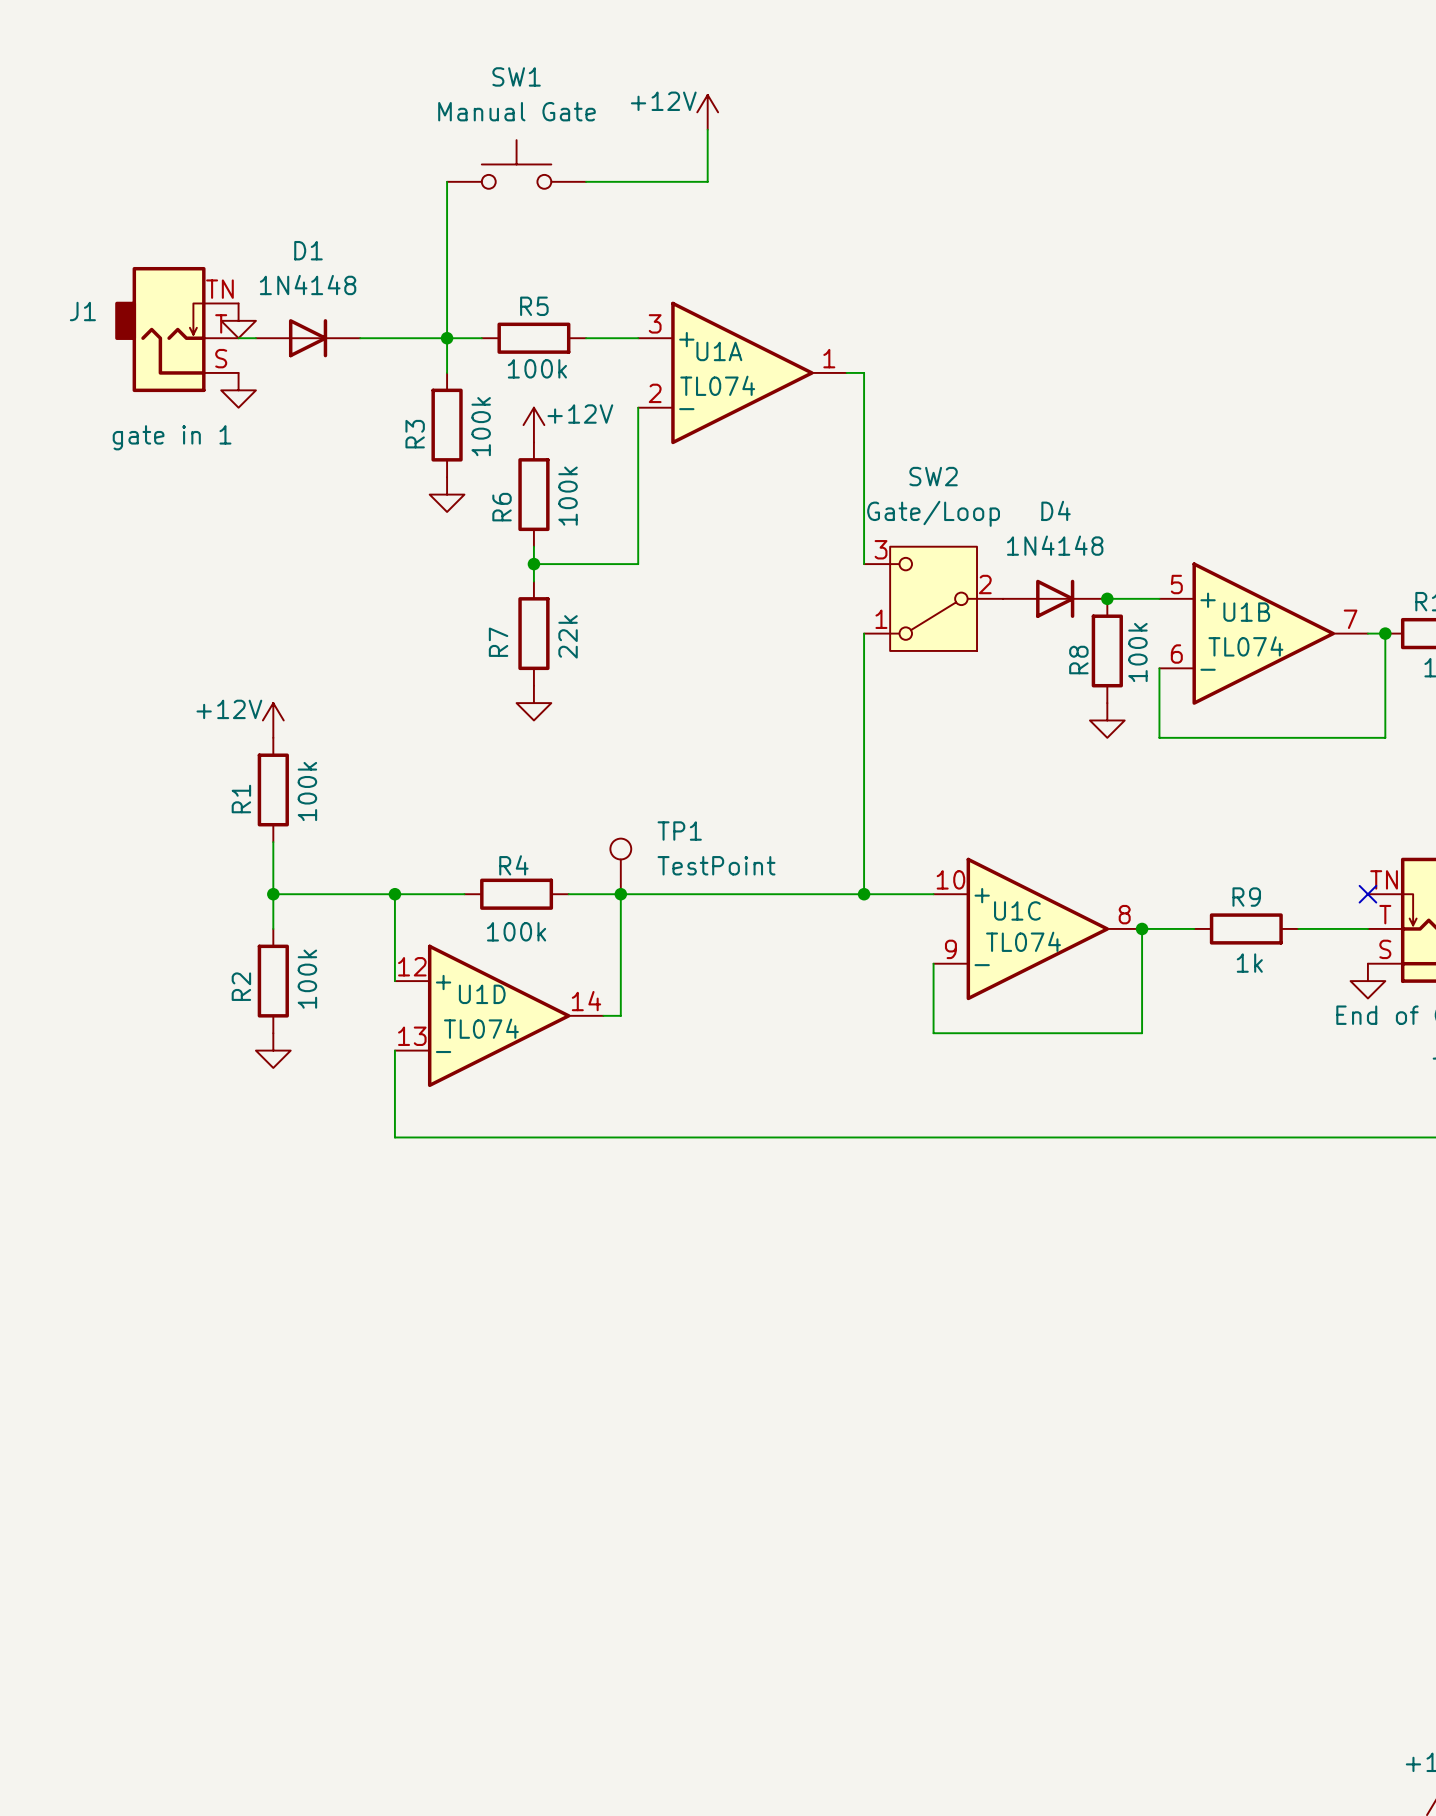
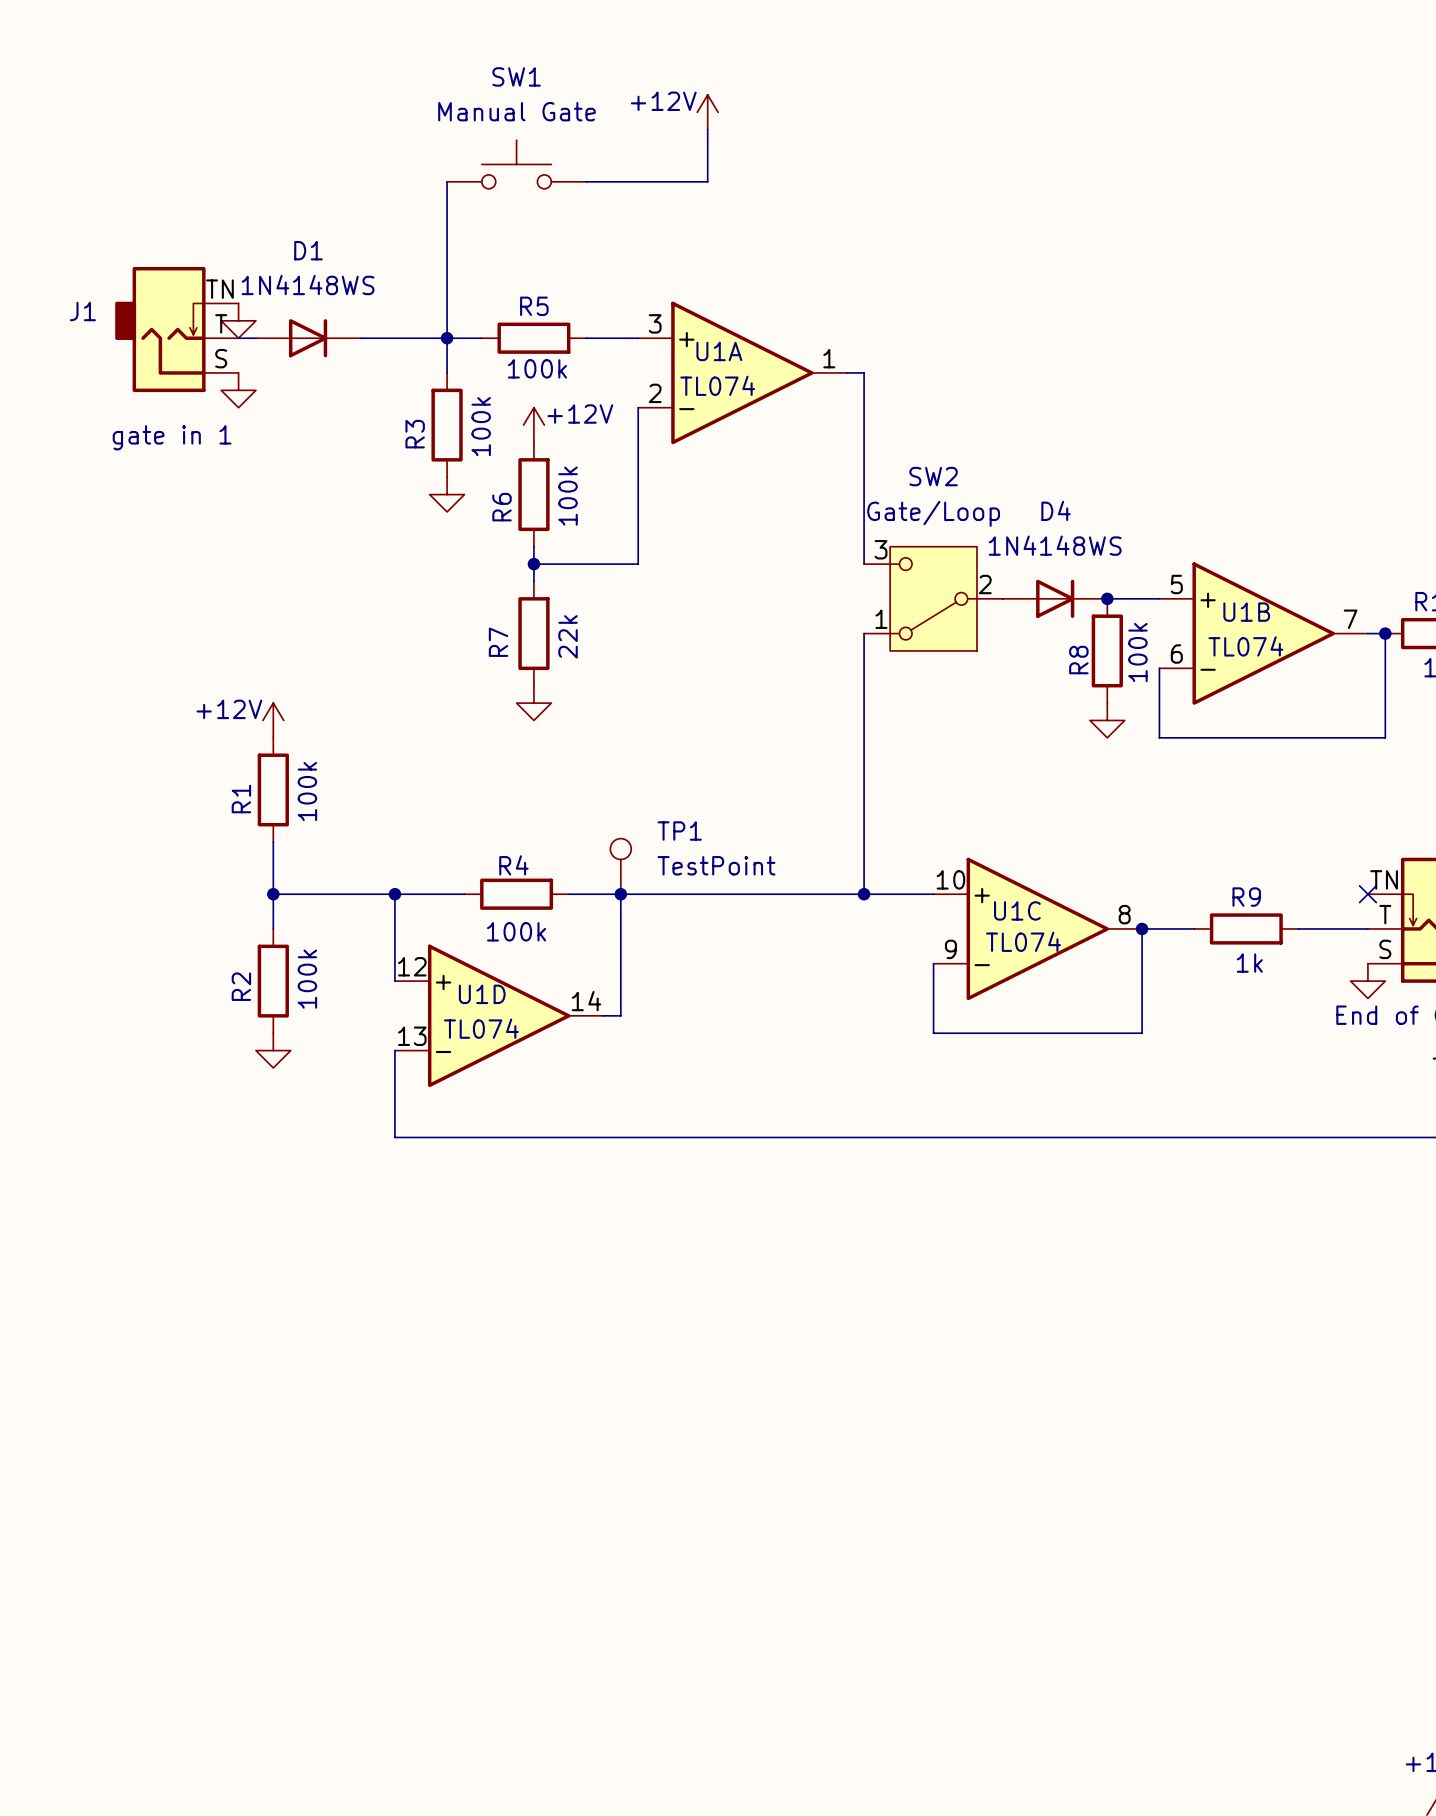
D1 value: 1N4148 (308, 285) -> 1N4148WS (308, 285)
D4 value: 1N4148 (1055, 545) -> 1N4148WS (1055, 545)

